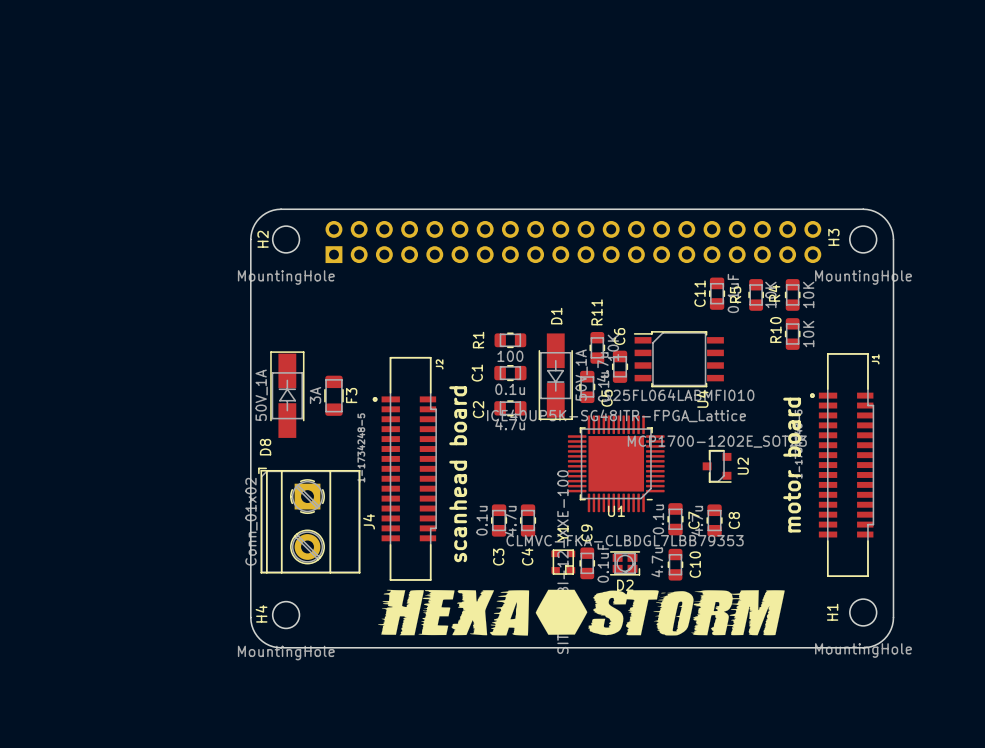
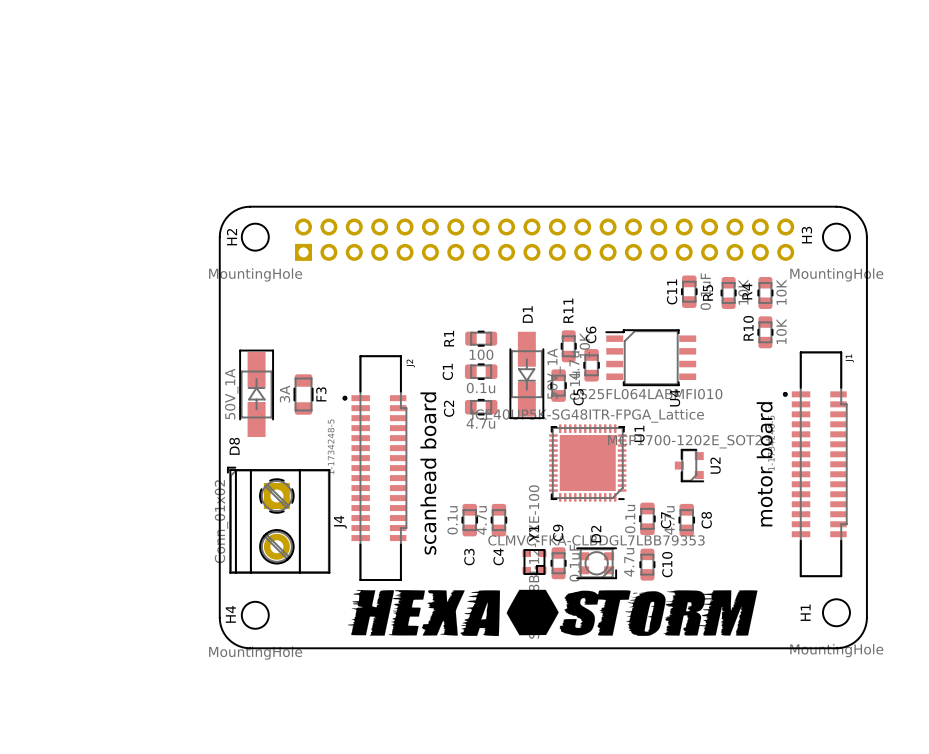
U1 footprint: [567, 415, 665, 513] -> [549, 424, 627, 502]
U1 name rotation: 0° (616, 511) -> 90° counterclockwise (639, 433)
U1 name position: U1 (616, 511) -> U1 (639, 433)
D2 footprint: [610, 551, 641, 576] -> [576, 547, 617, 579]
D2 name rotation: 0° (625, 585) -> 90° counterclockwise (596, 534)
D2 name position: D2 (625, 585) -> D2 (596, 534)

